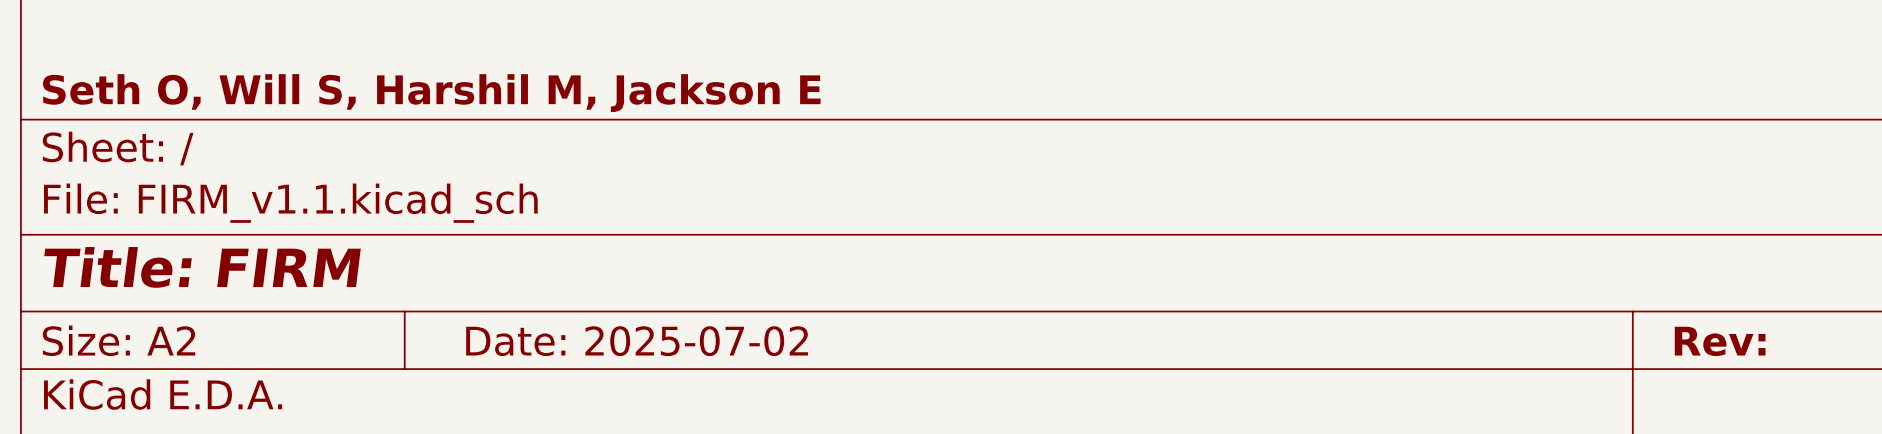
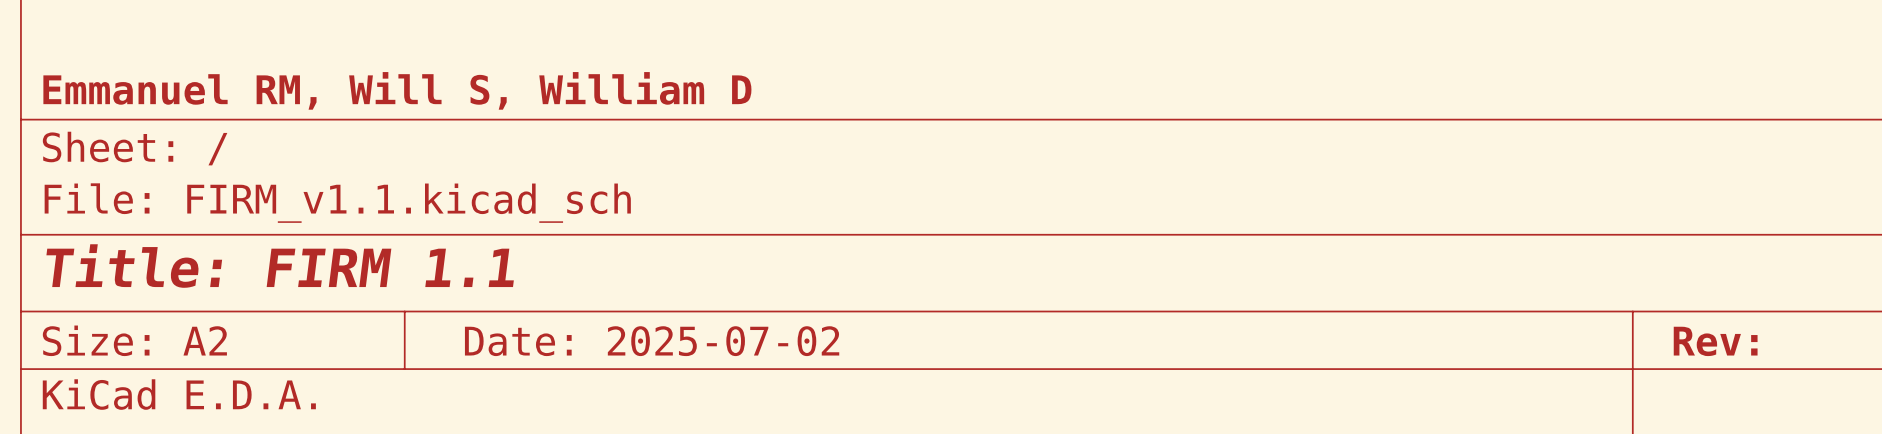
title block: Seth O, Will S, Harshil M, Jackson E (431, 93) -> Emmanuel RM, Will S, William D (397, 90)
title block: Title: FIRM (202, 267) -> Title: FIRM 1.1 (280, 266)

